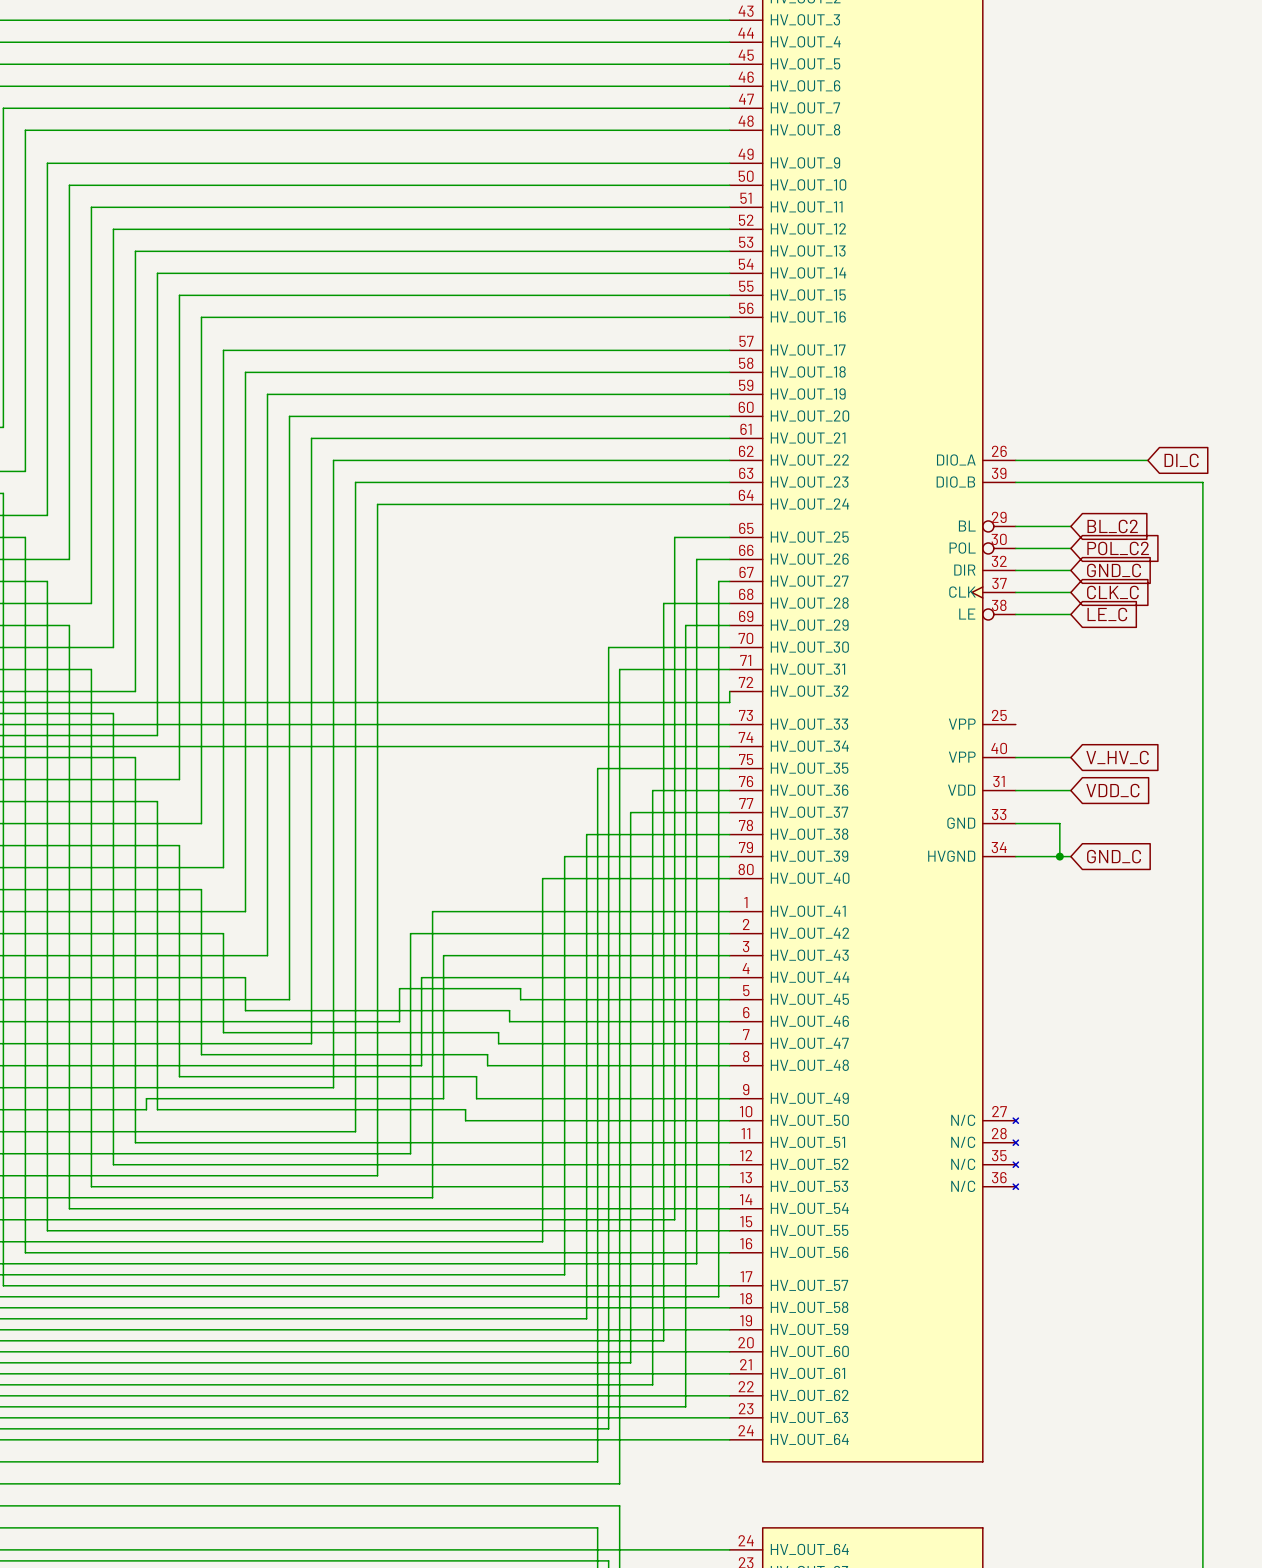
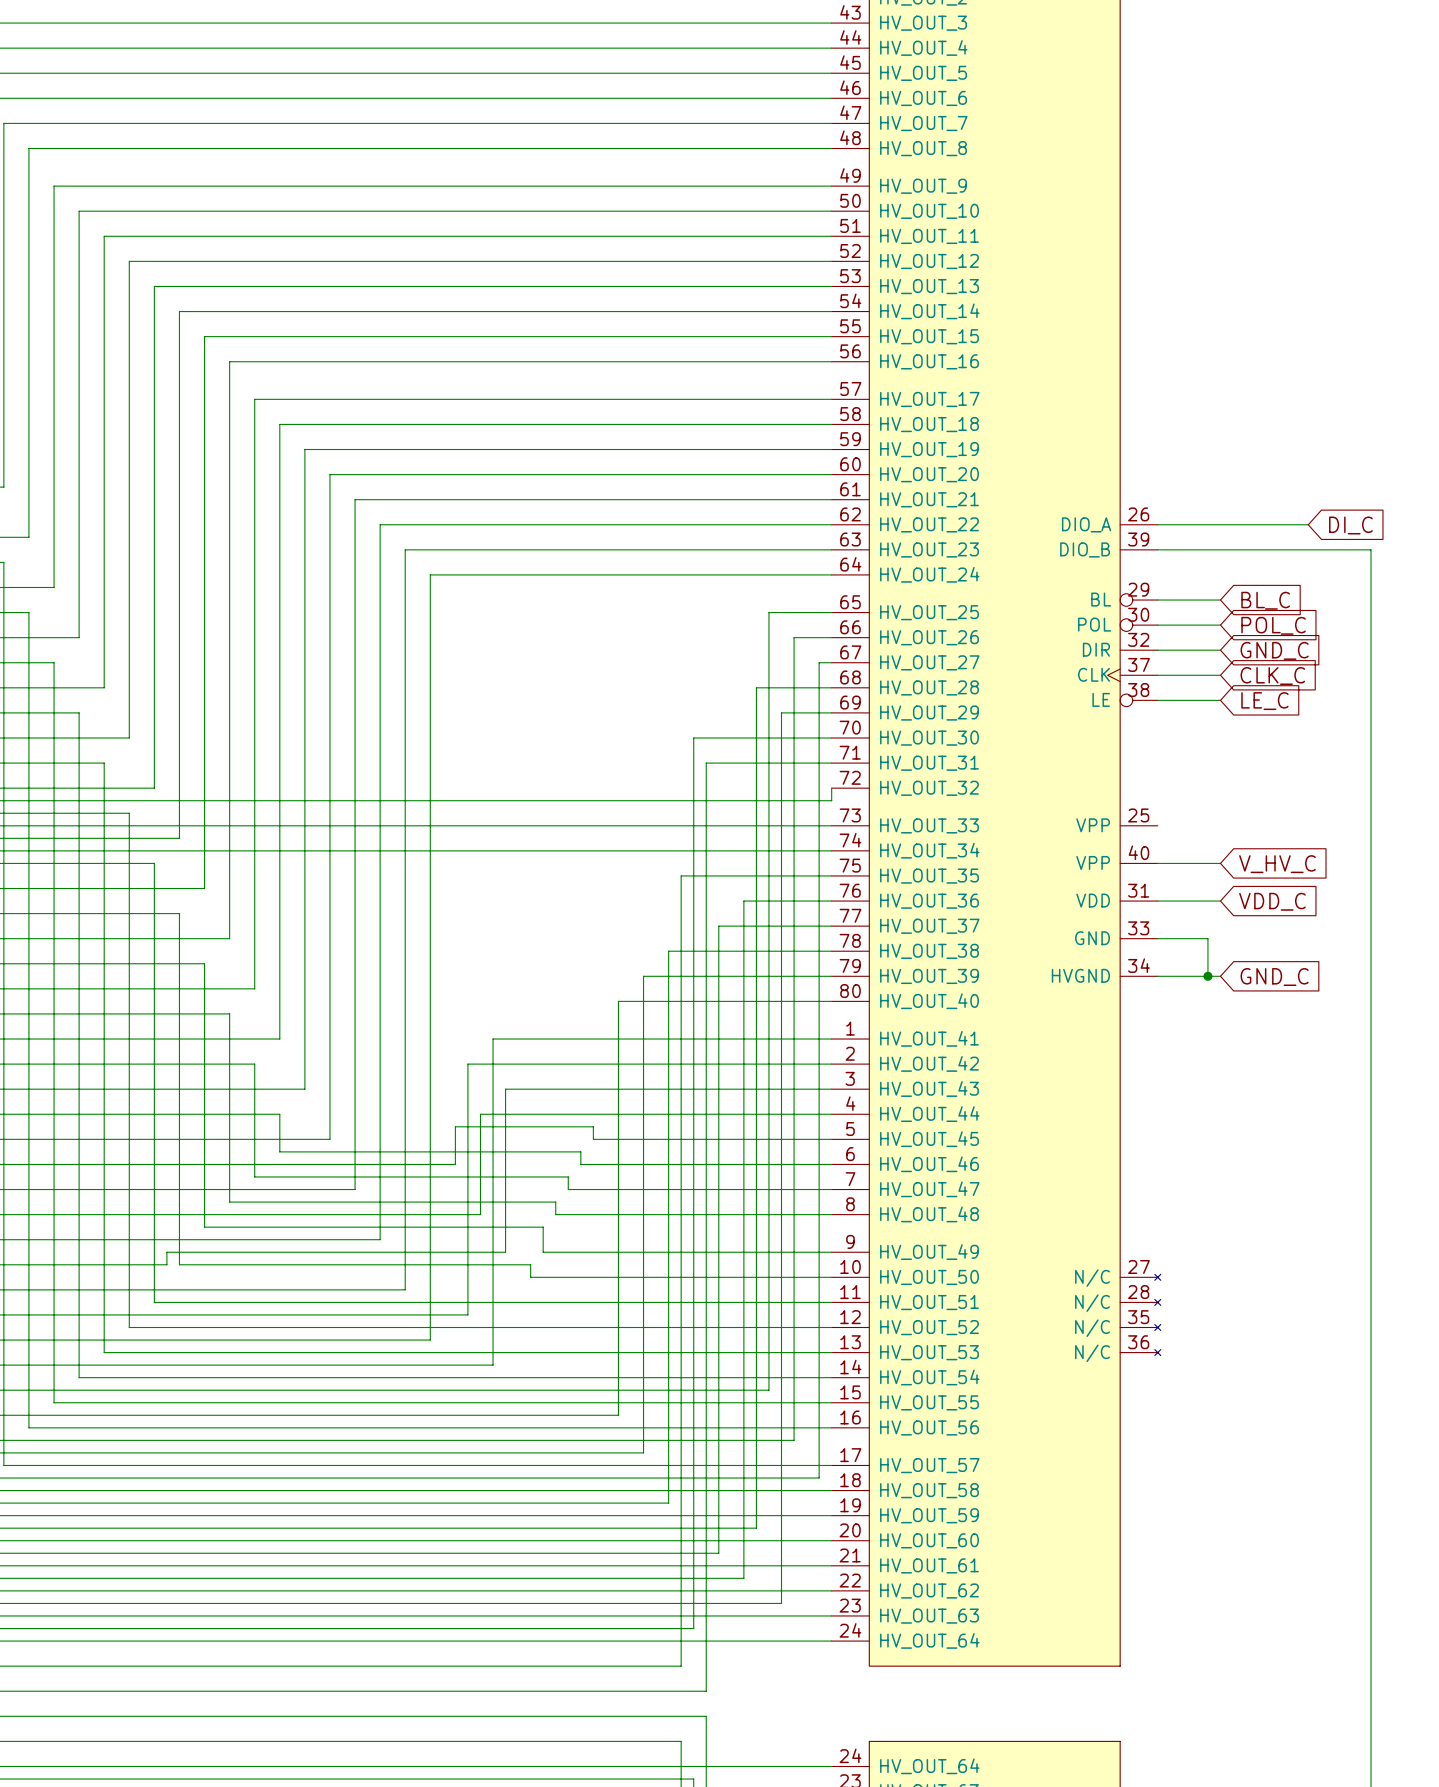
global label: BL_C2 (1112, 526) -> BL_C (1265, 600)
global label: POL_C2 (1118, 548) -> POL_C (1273, 625)

